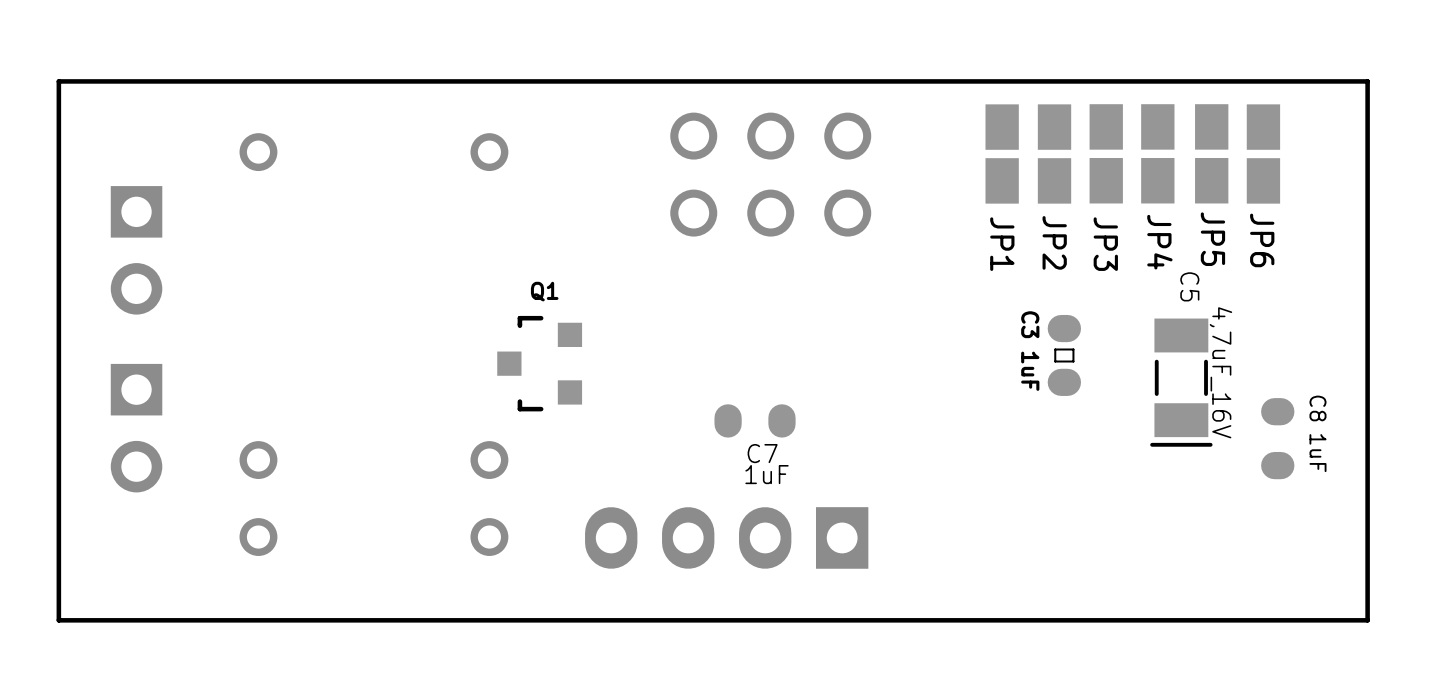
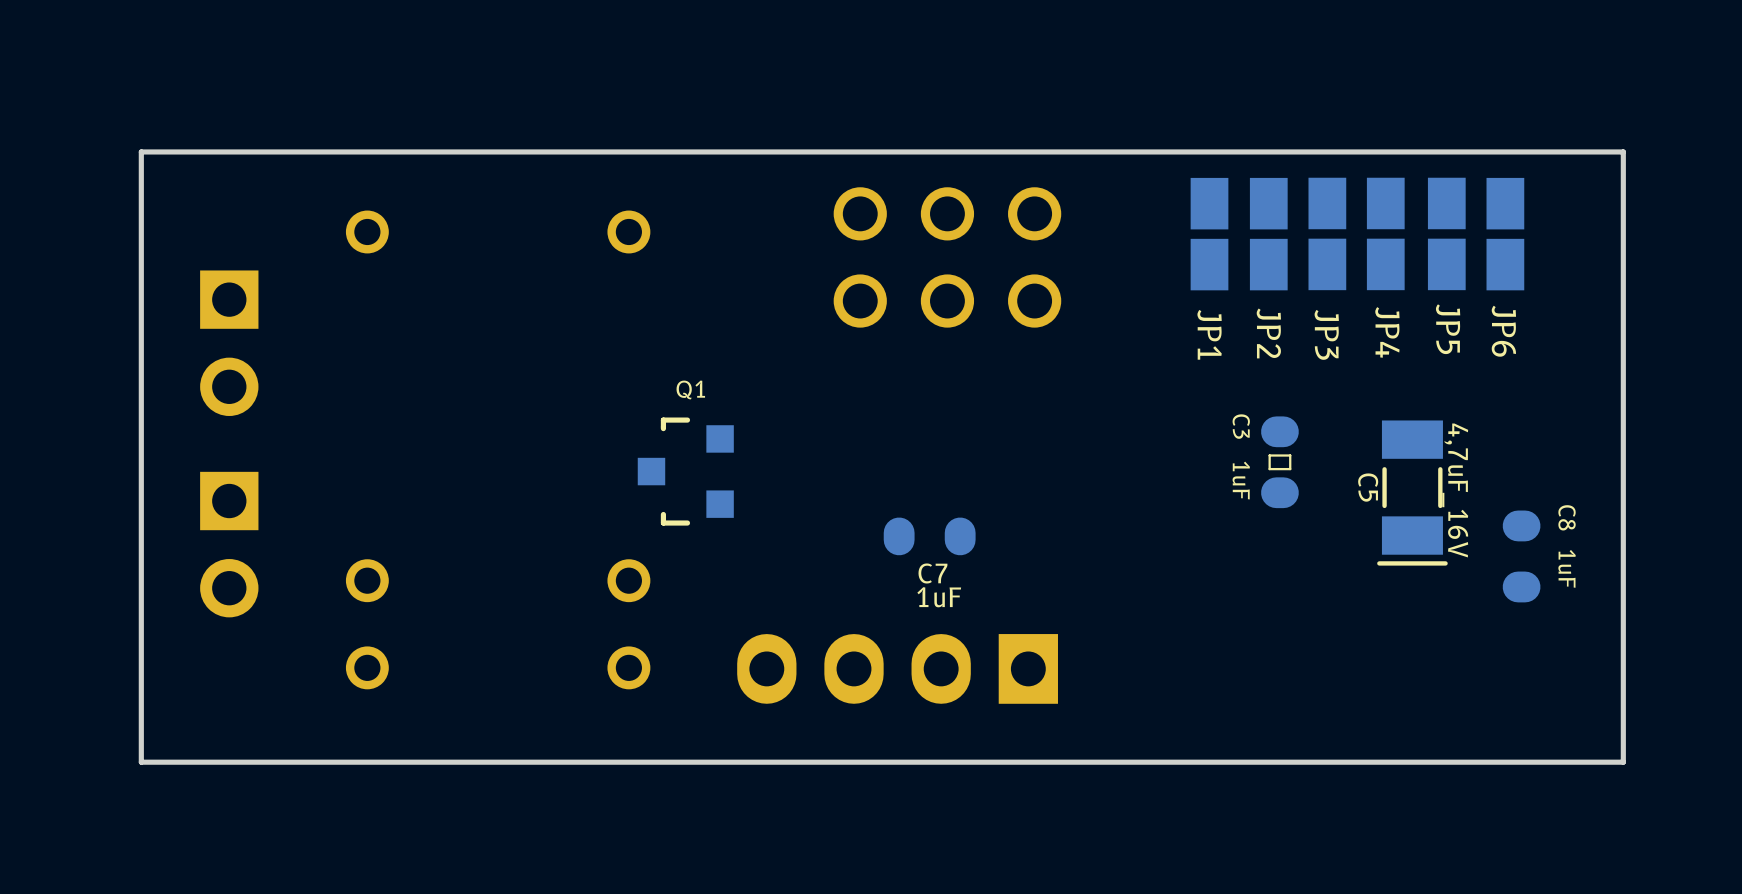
C5 name position: C5 (1189, 286) -> C5 (1368, 487)

